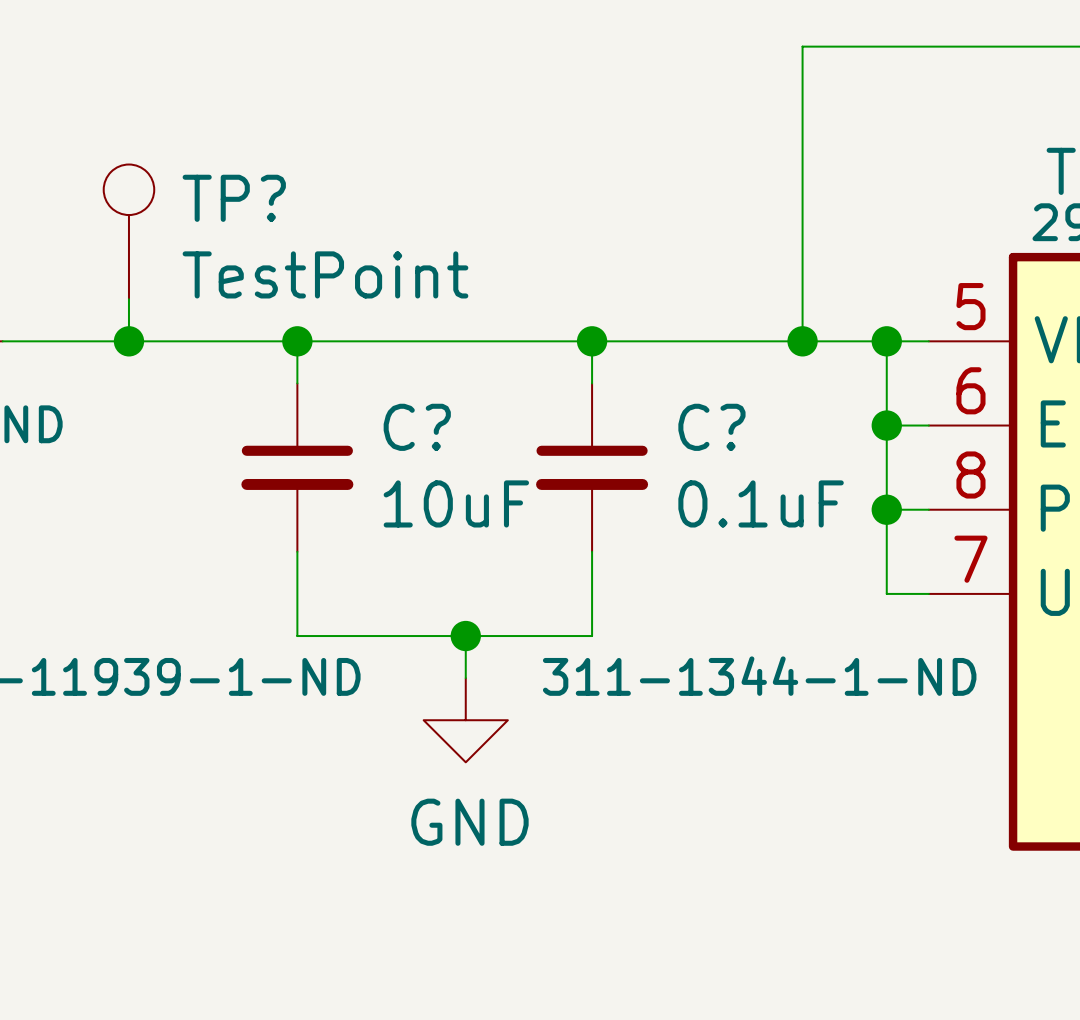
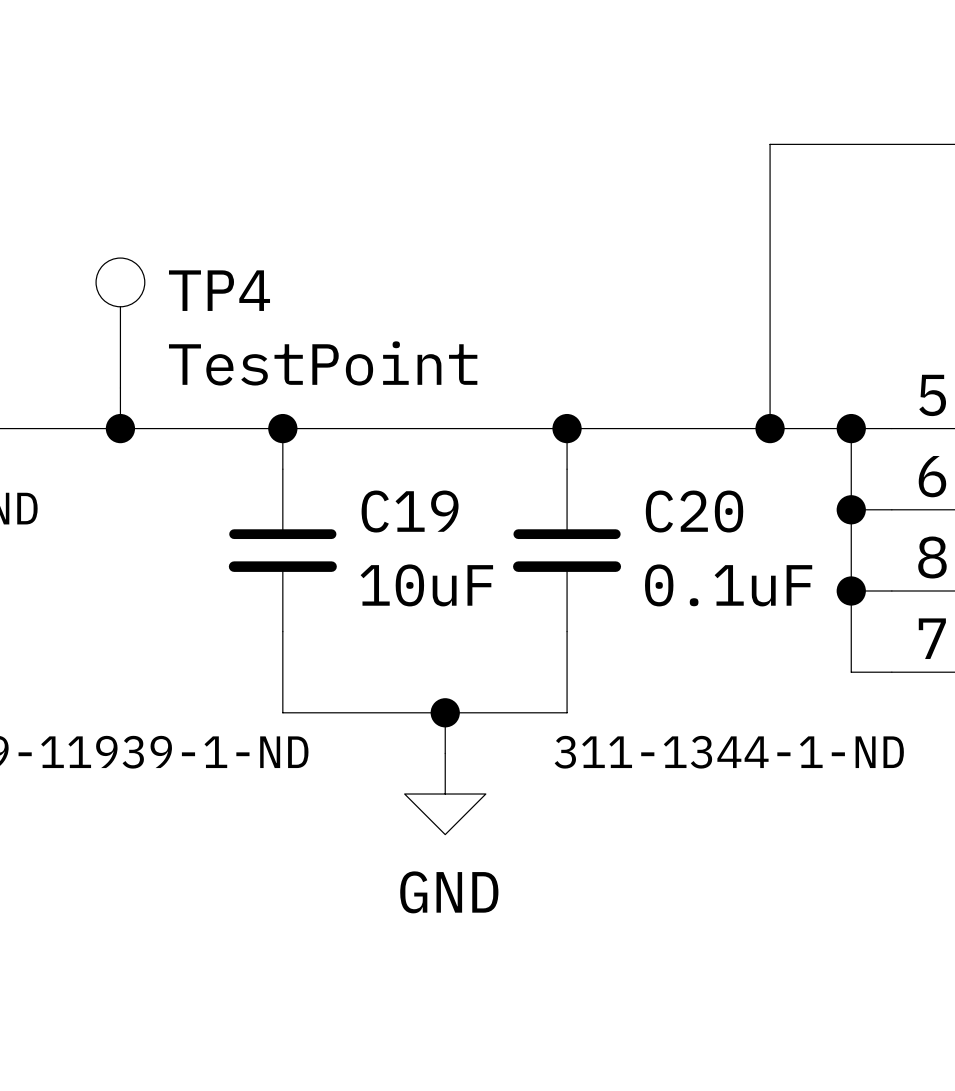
TP? name: TP? (234, 198) -> TP4 (219, 290)
C? name: C? (417, 427) -> C19 (410, 511)
C? name: C? (711, 427) -> C20 (694, 511)

